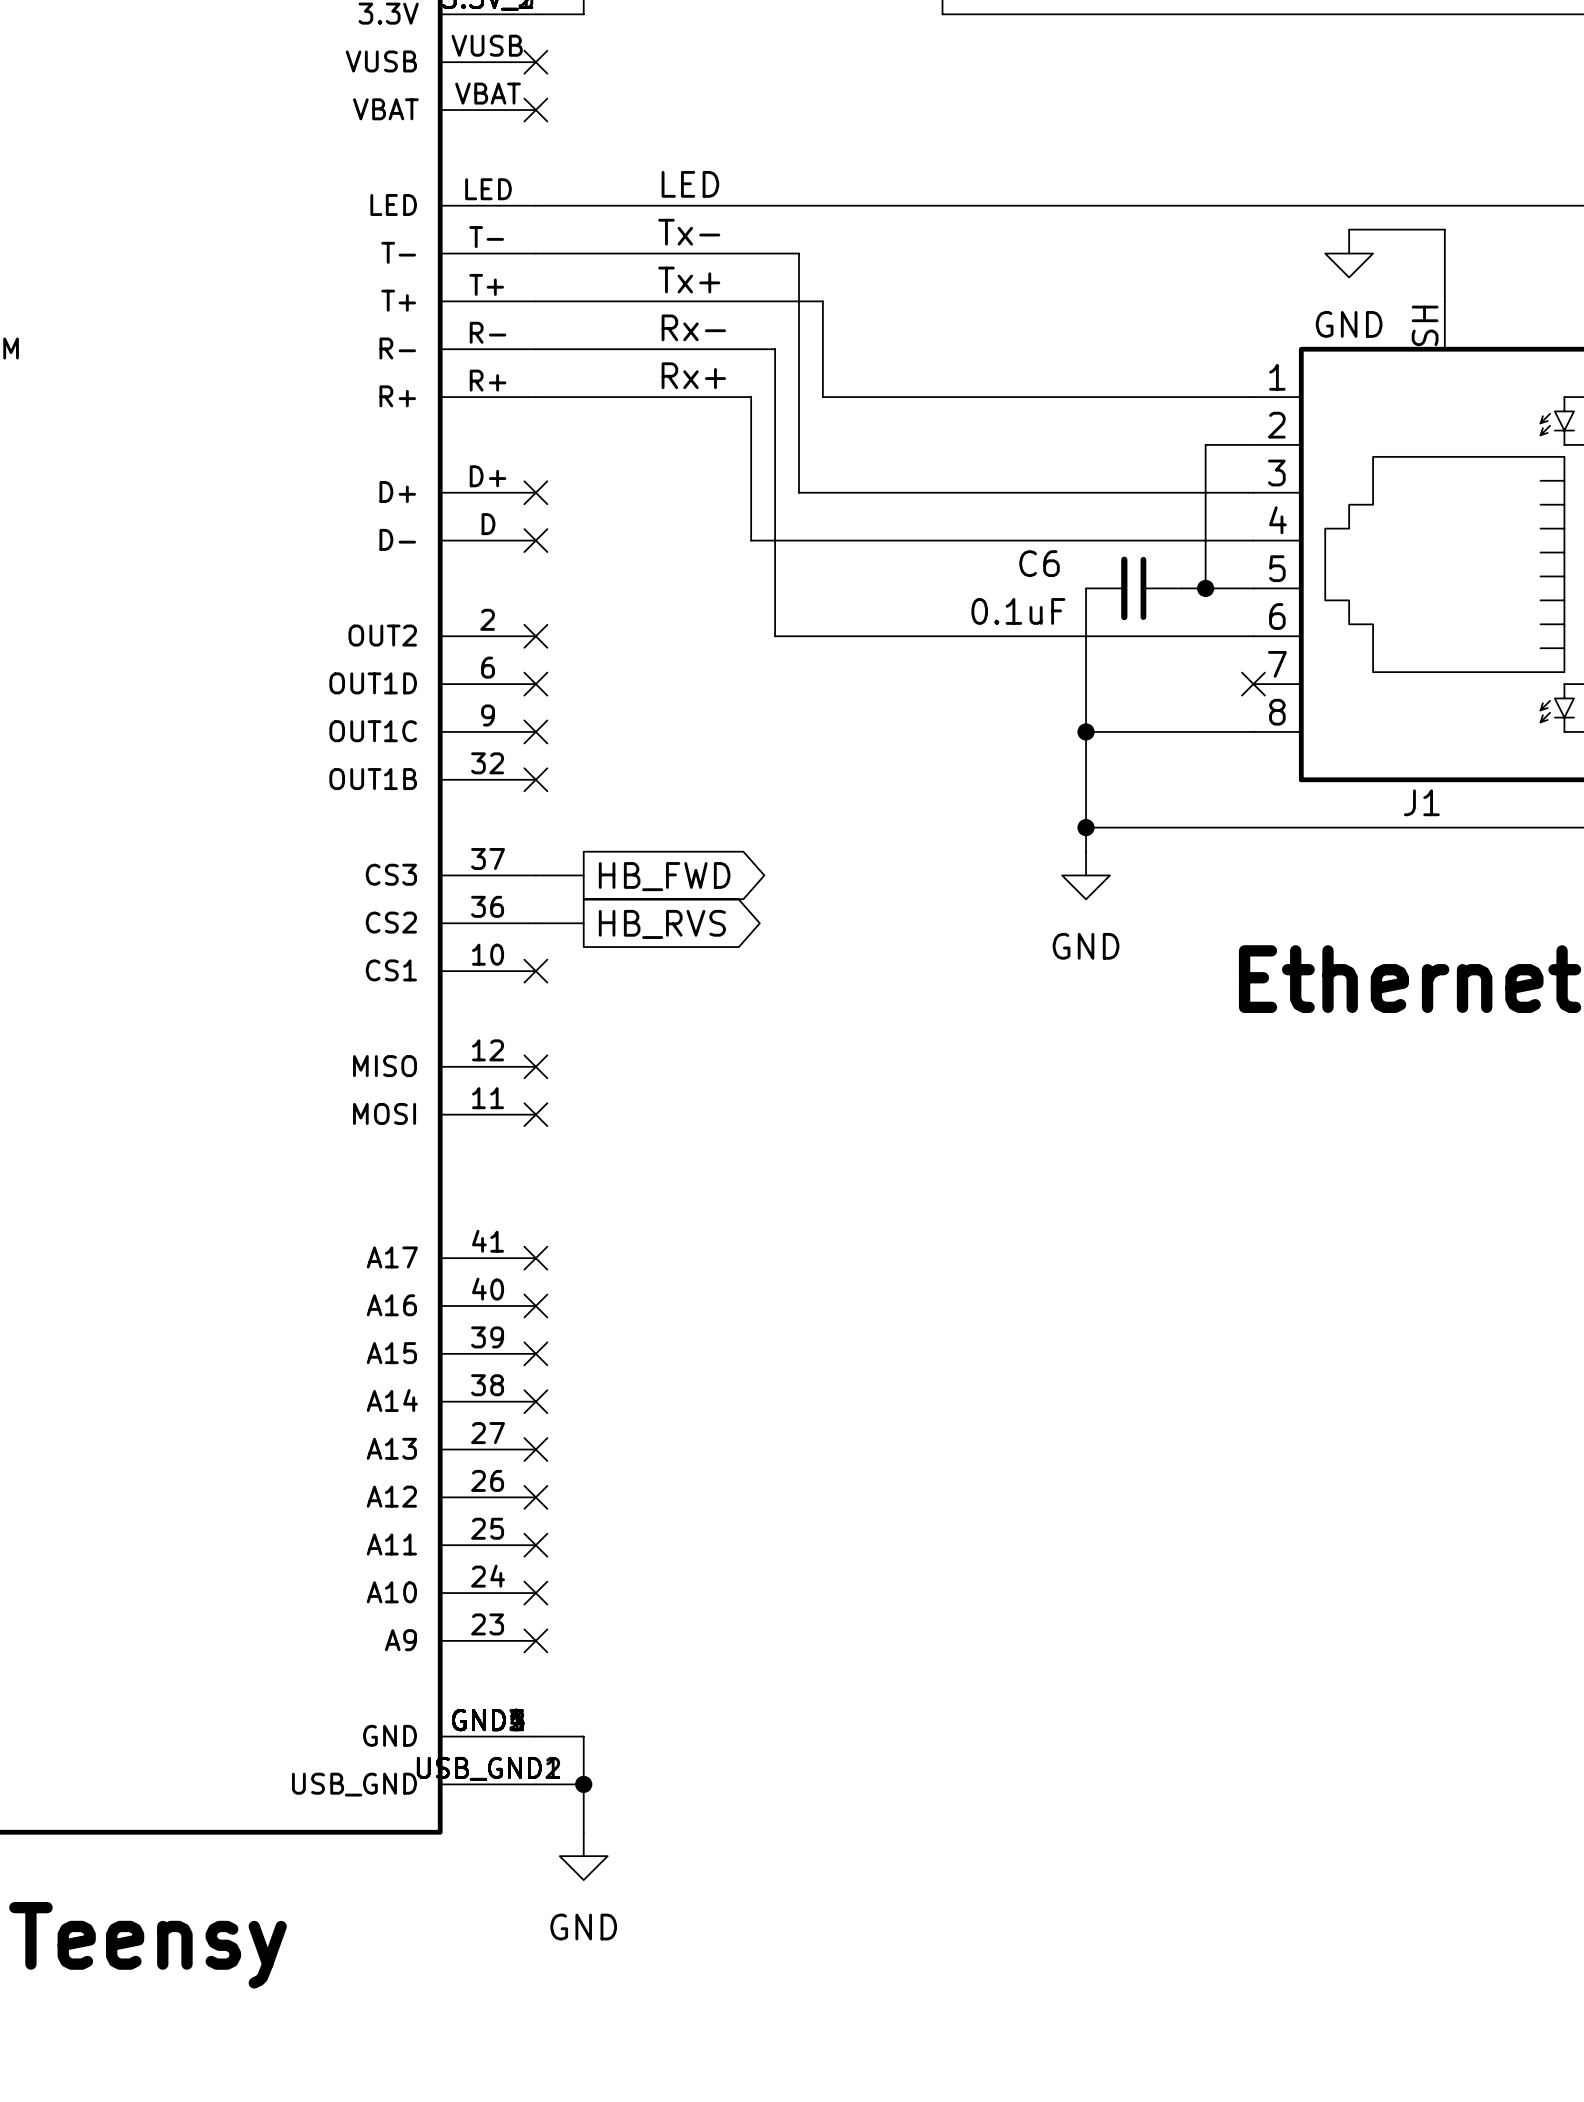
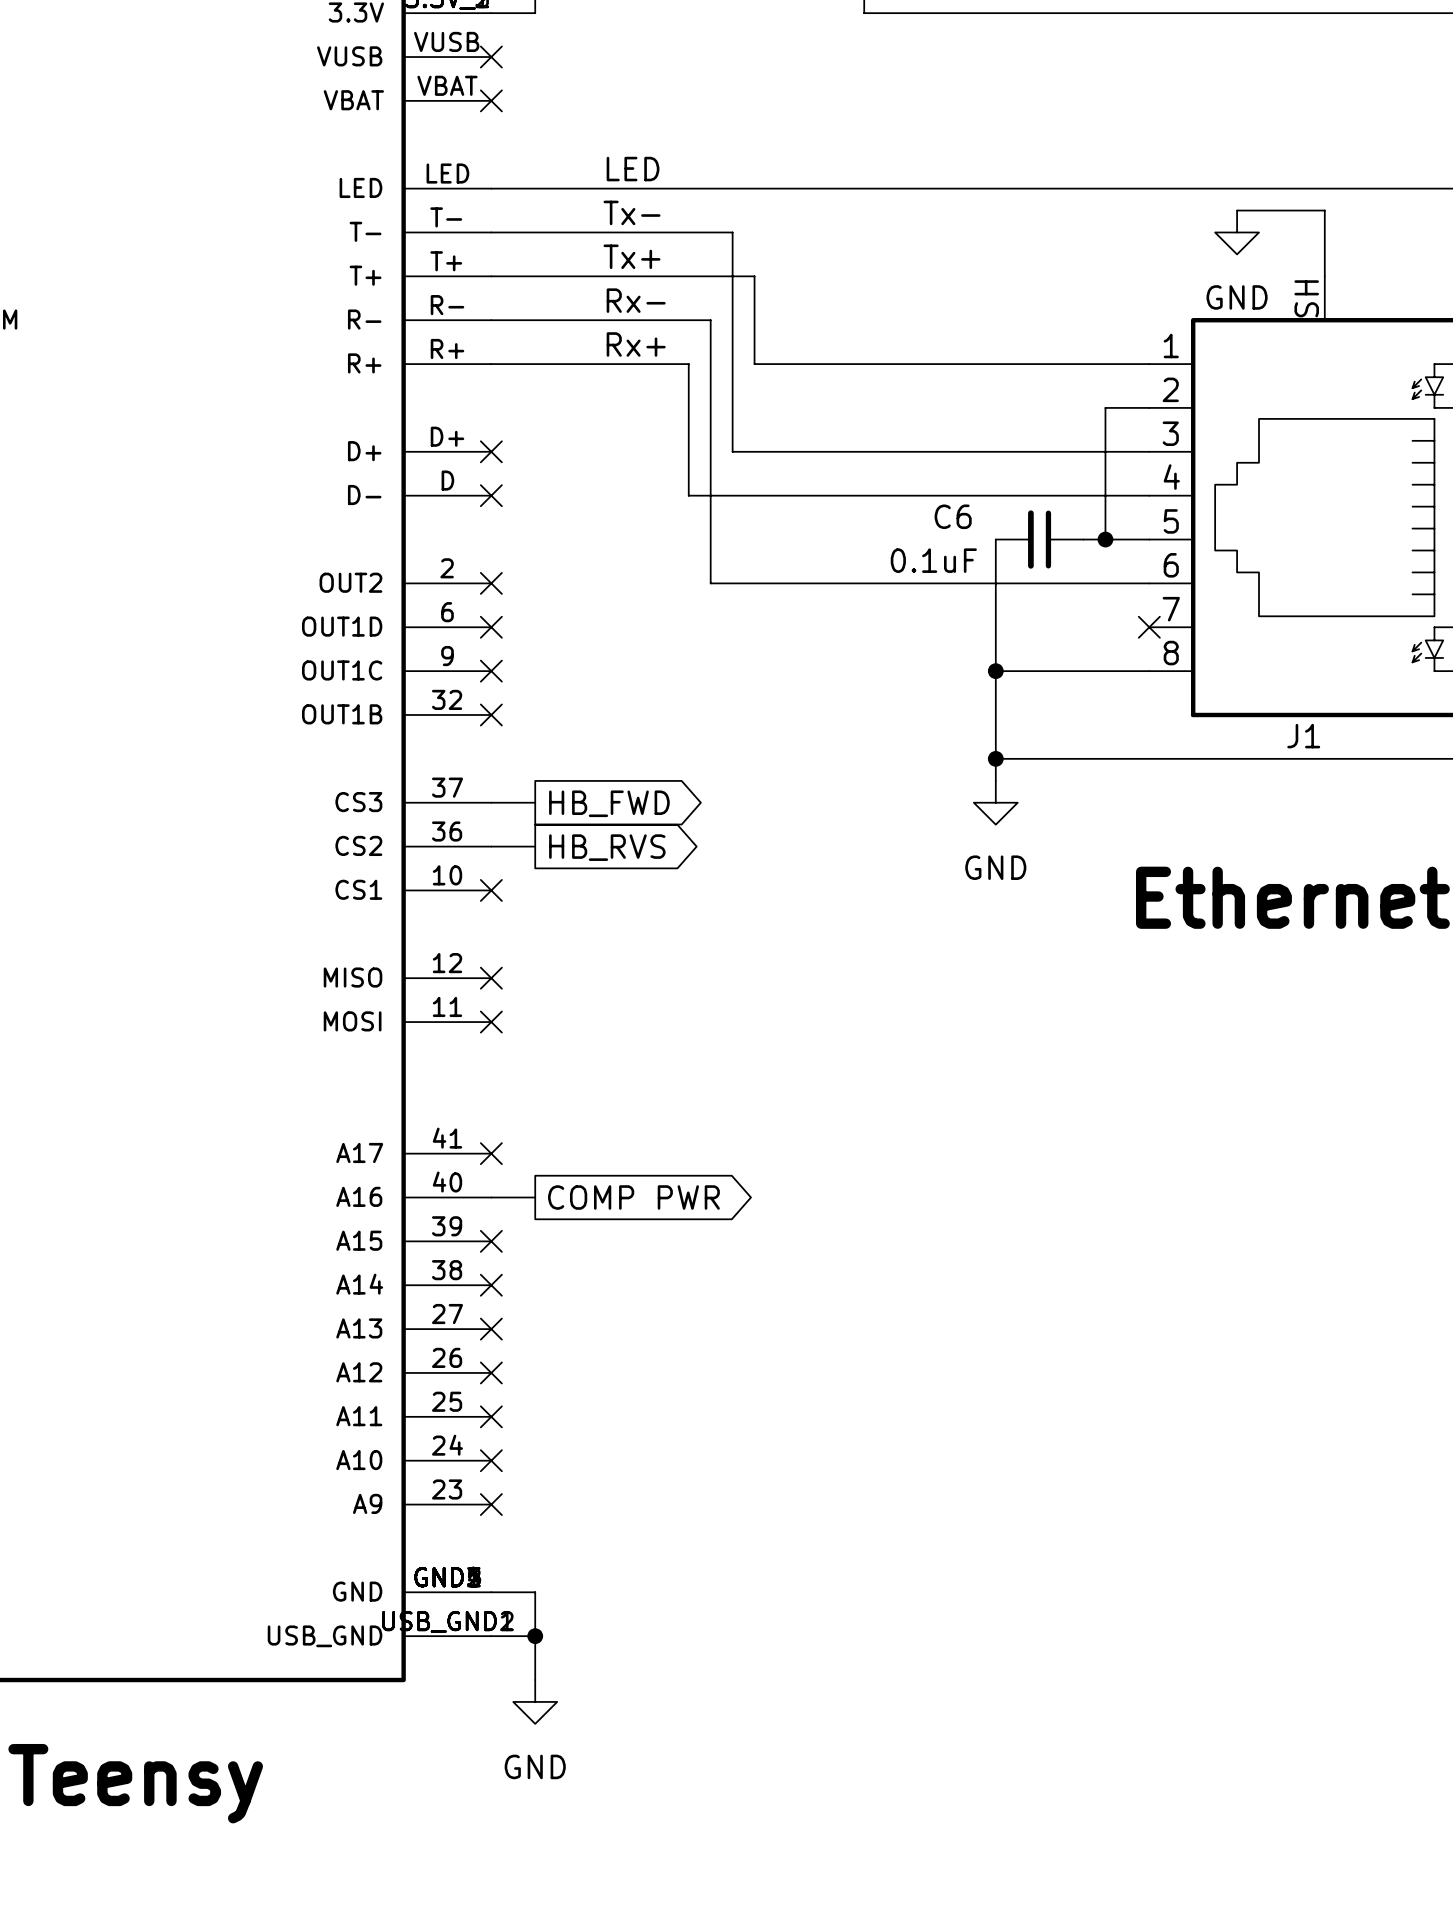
wire: none -> (491, 1197) (535, 1197)
no-connect mark: (535, 1306) -> none
global label: none -> COMP PWR (633, 1197)

